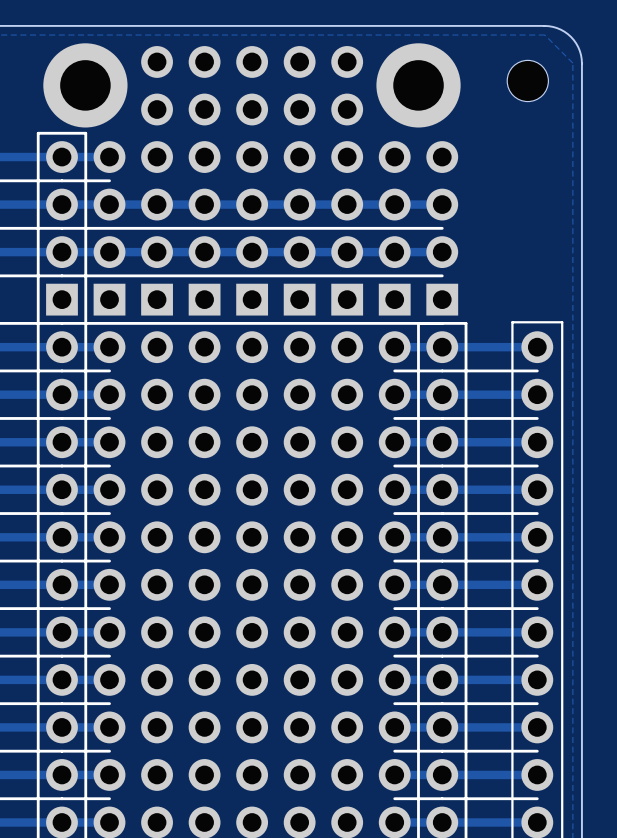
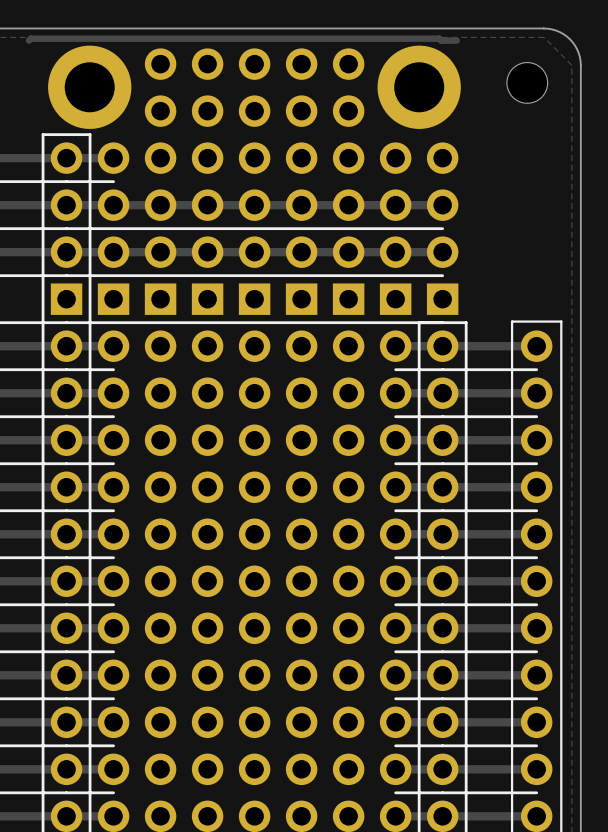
track: none -> (28, 40) (30, 38) (439, 38) (441, 40) (456, 40)

